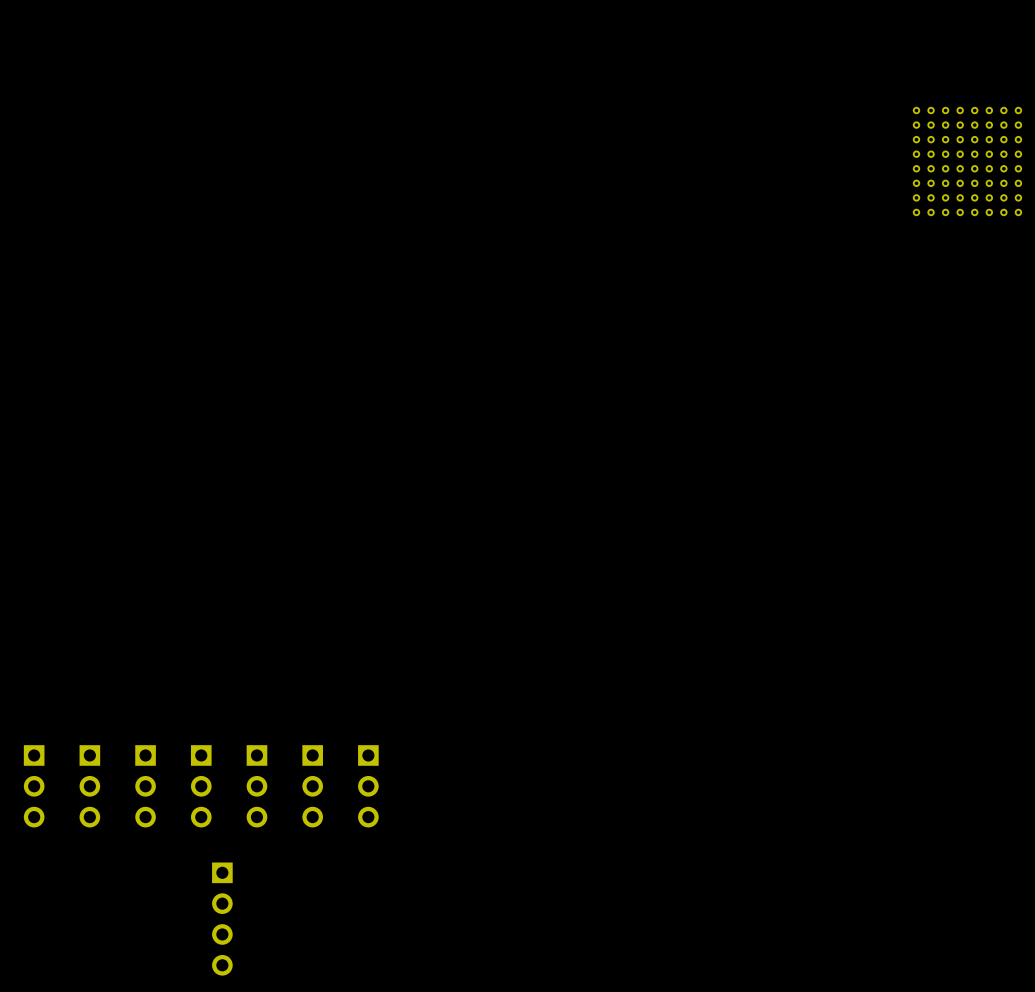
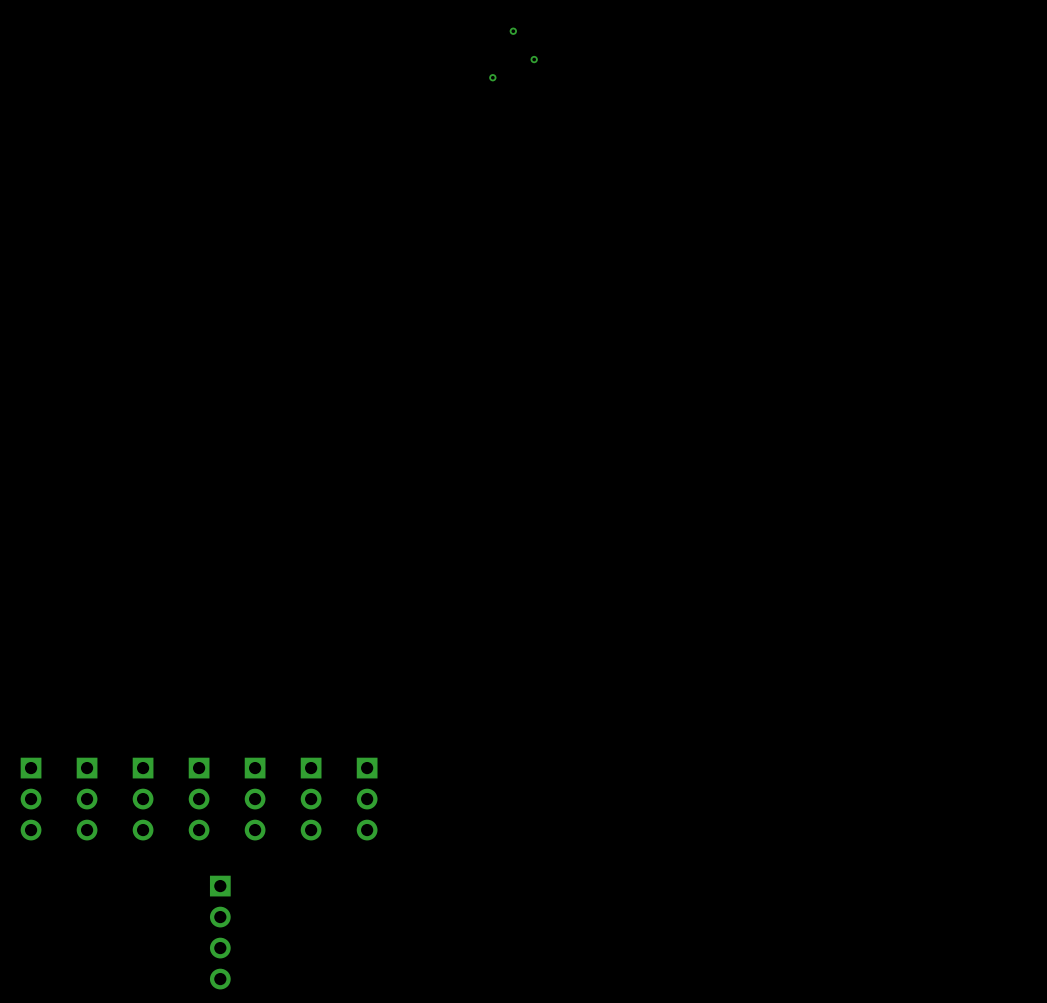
via: none -> (513, 31)
via: none -> (534, 59)
via: none -> (492, 77)
part: (967, 161) -> none

